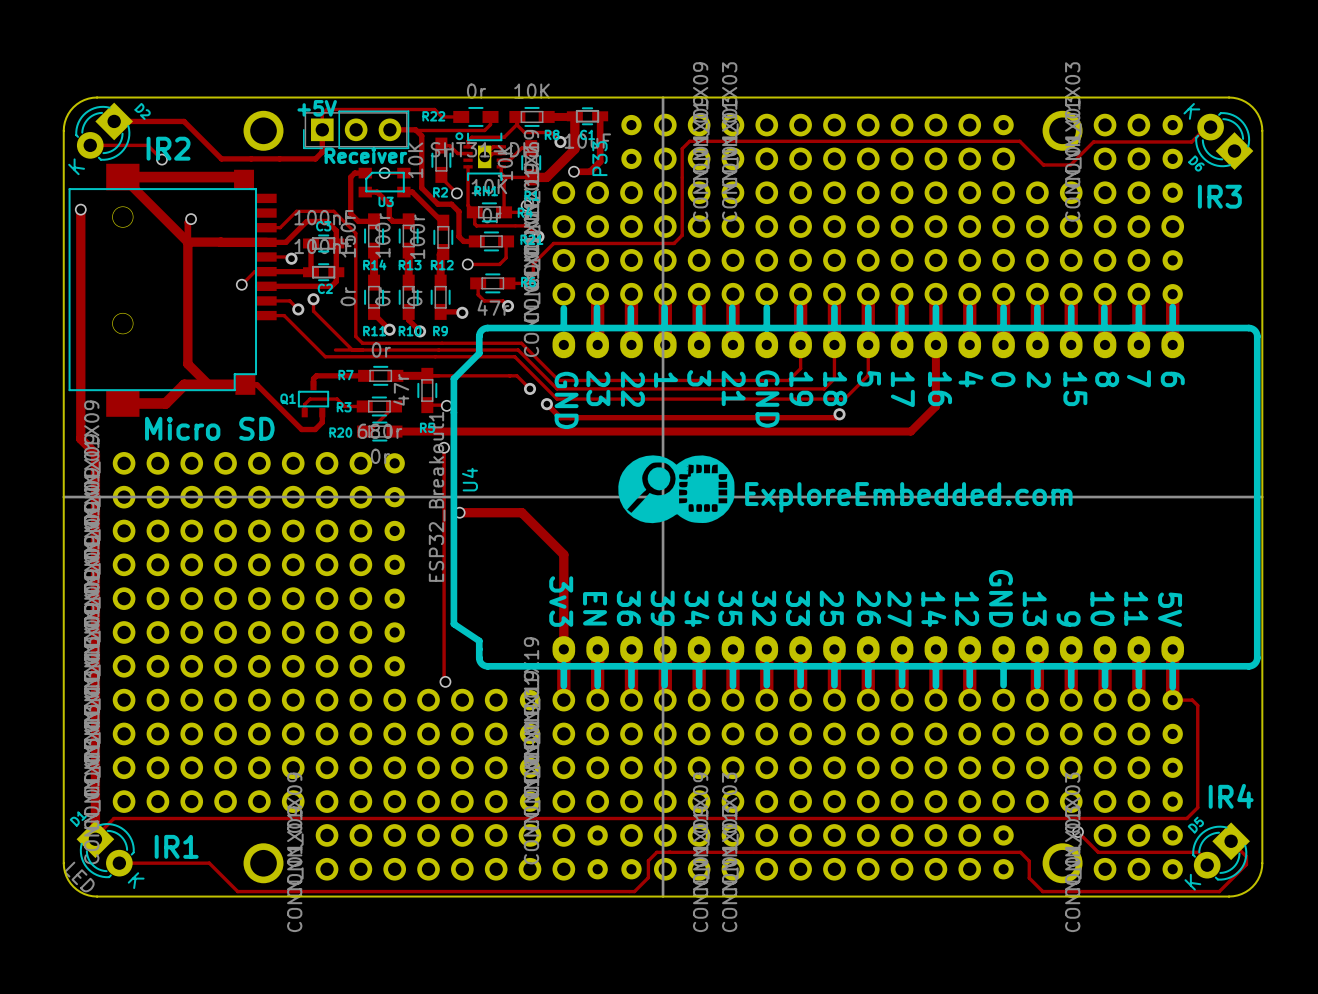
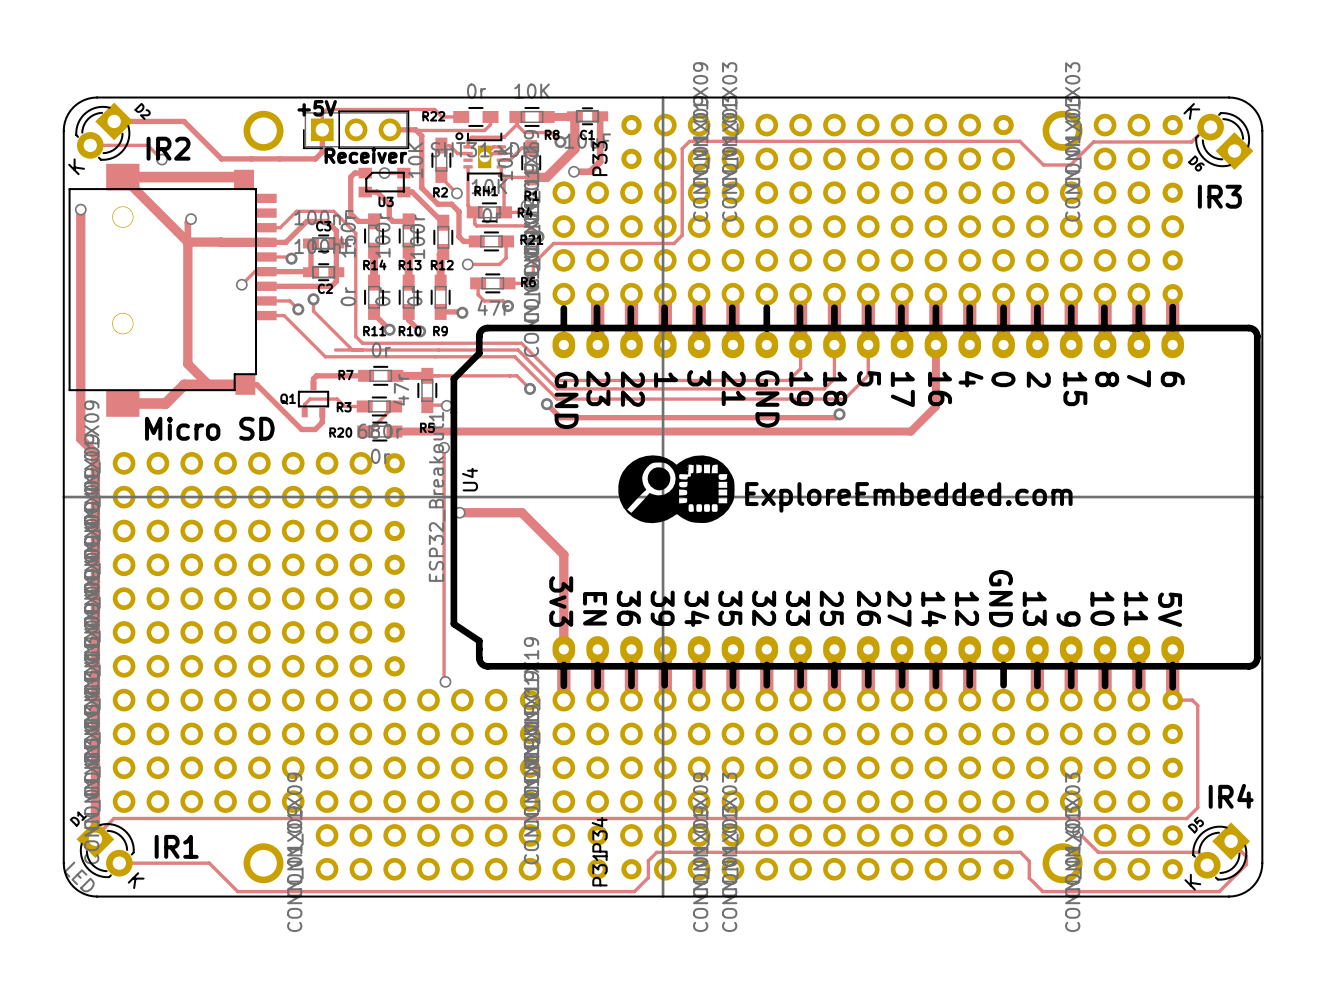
P34 name: none -> P34 (599, 834)
P31 name: none -> P31 (599, 868)

